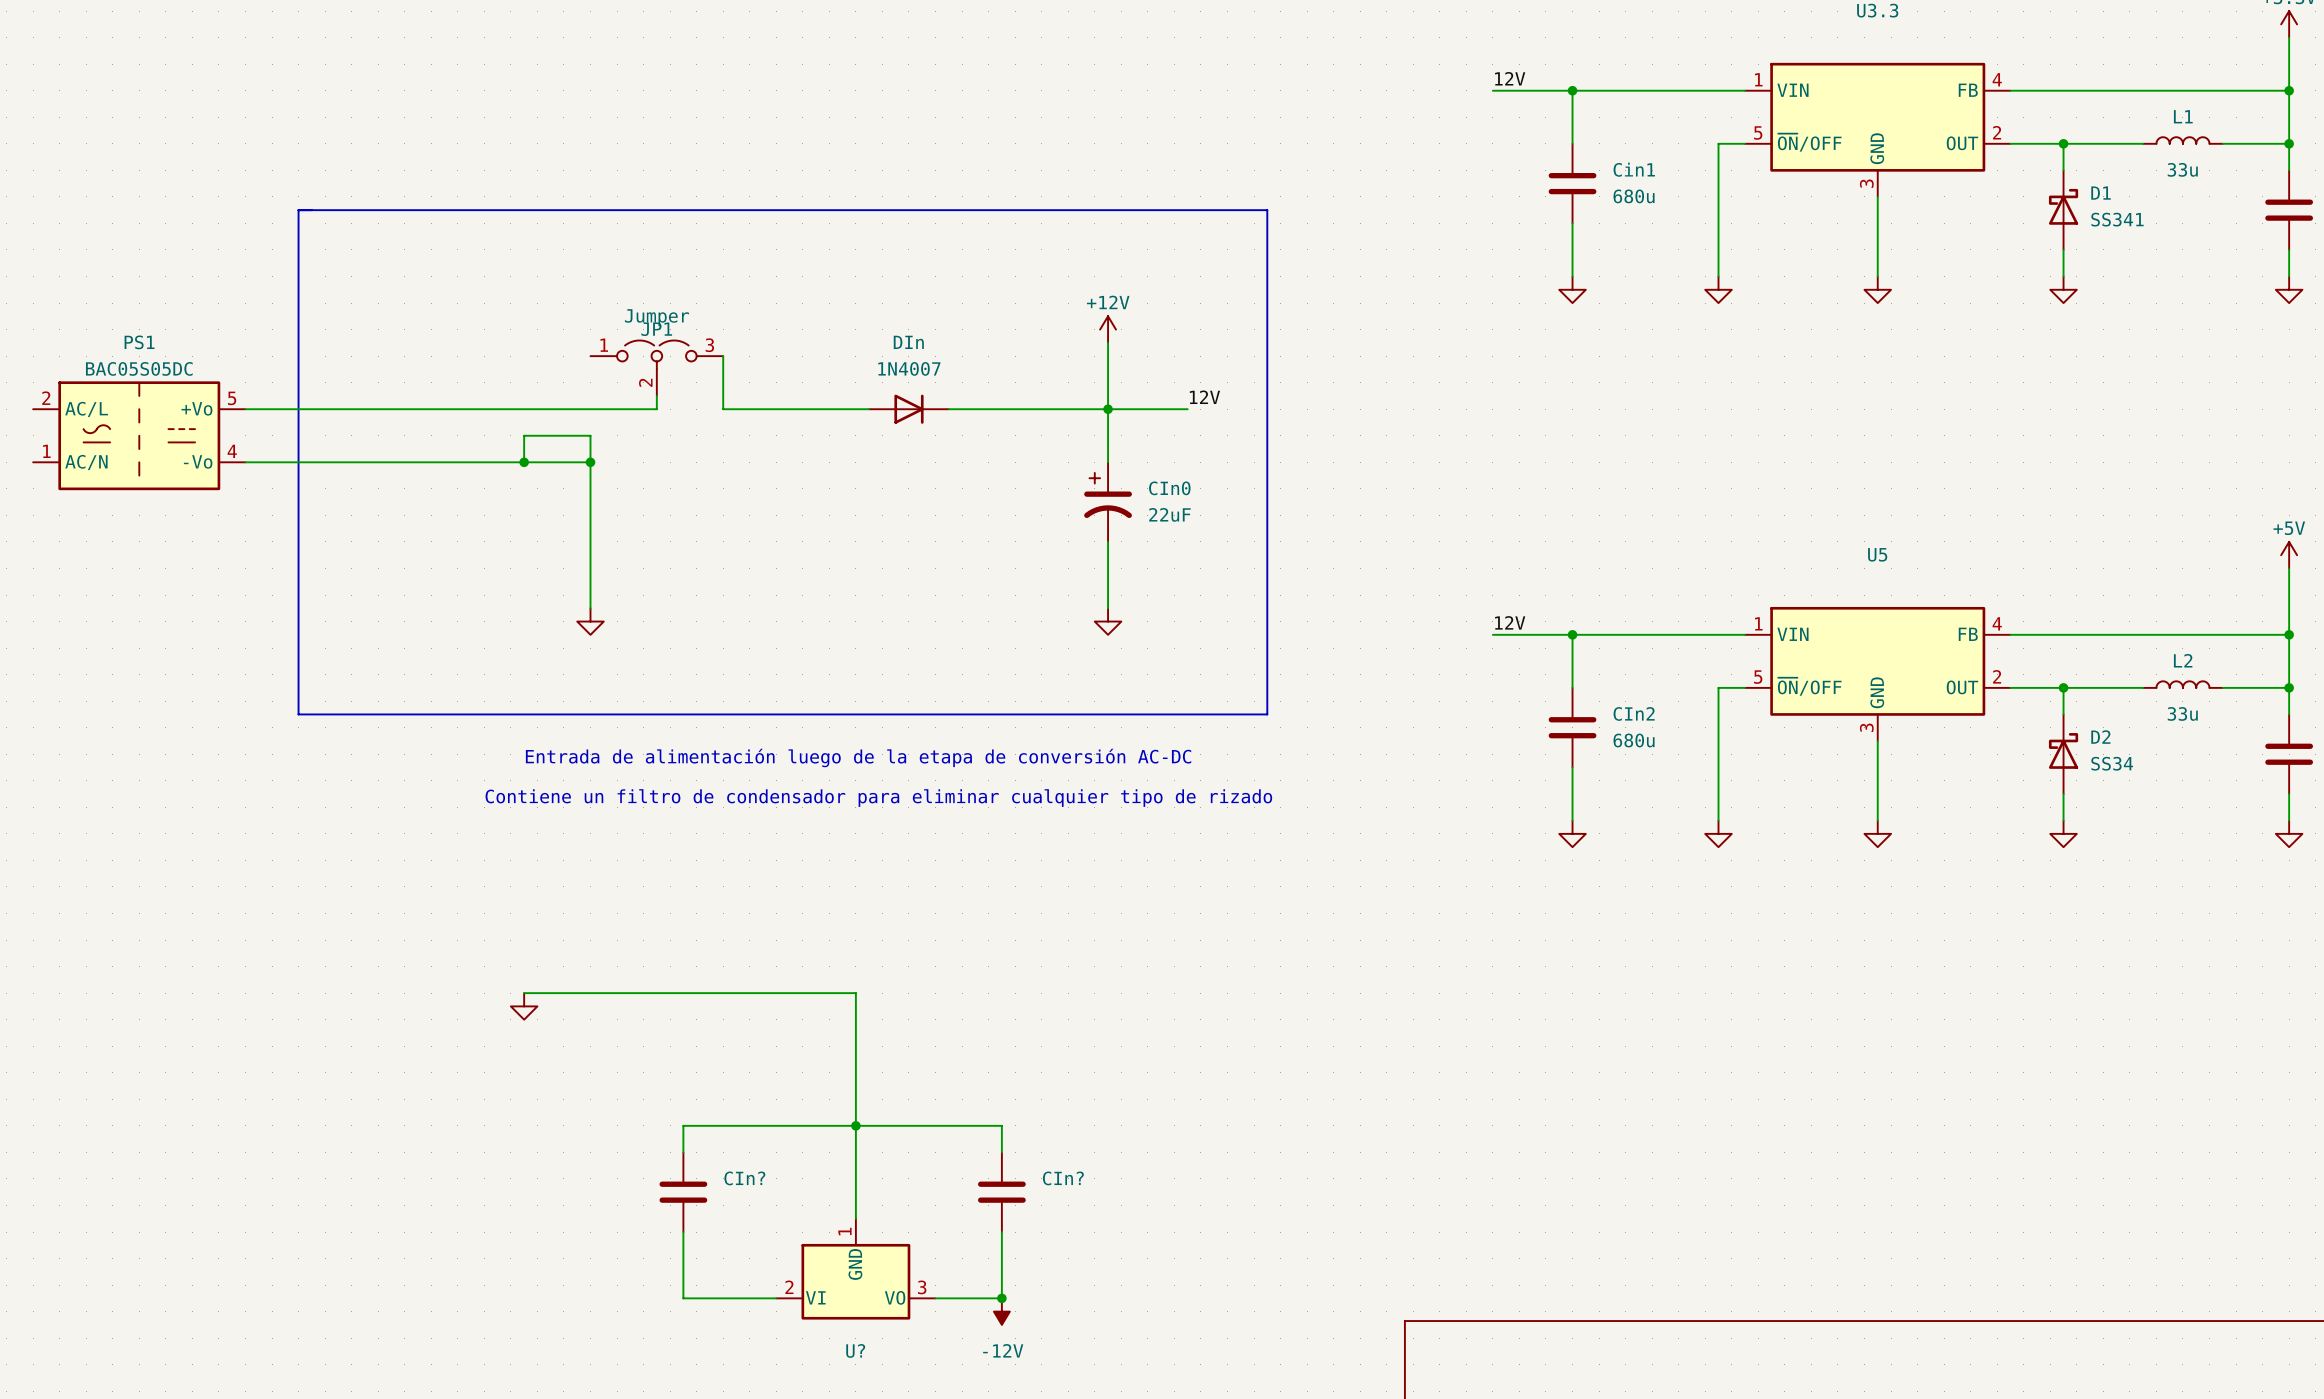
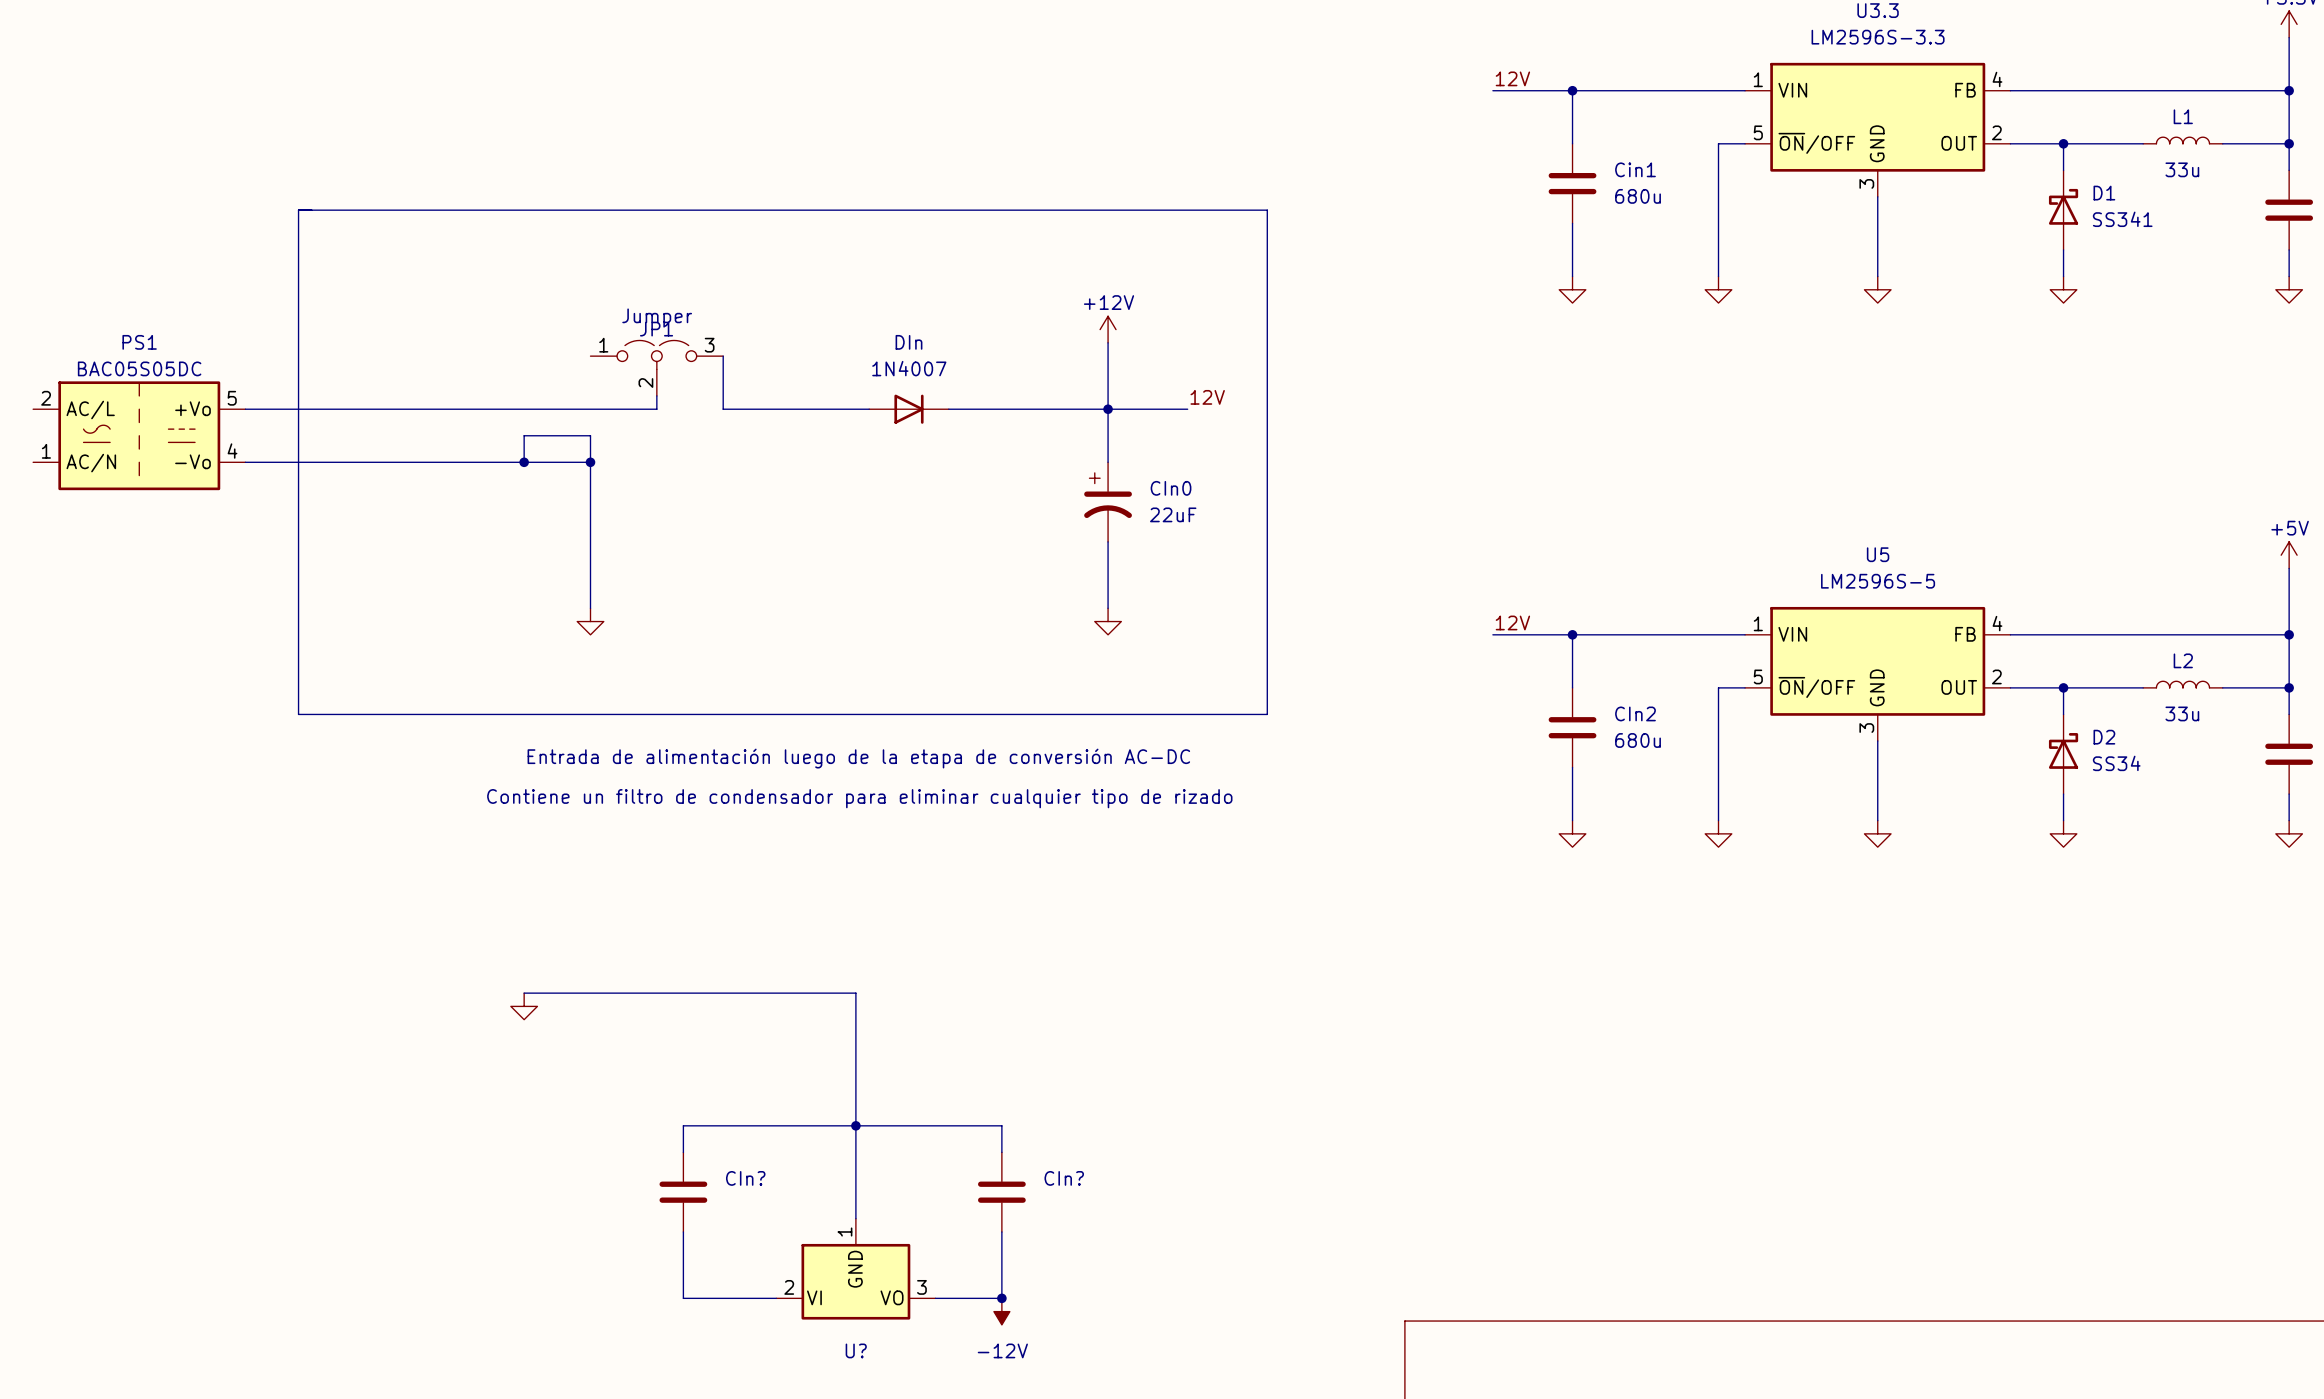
U3.3 value: none -> LM2596S-3.3 (1878, 37)
U5 value: none -> LM2596S-5 (1878, 581)

